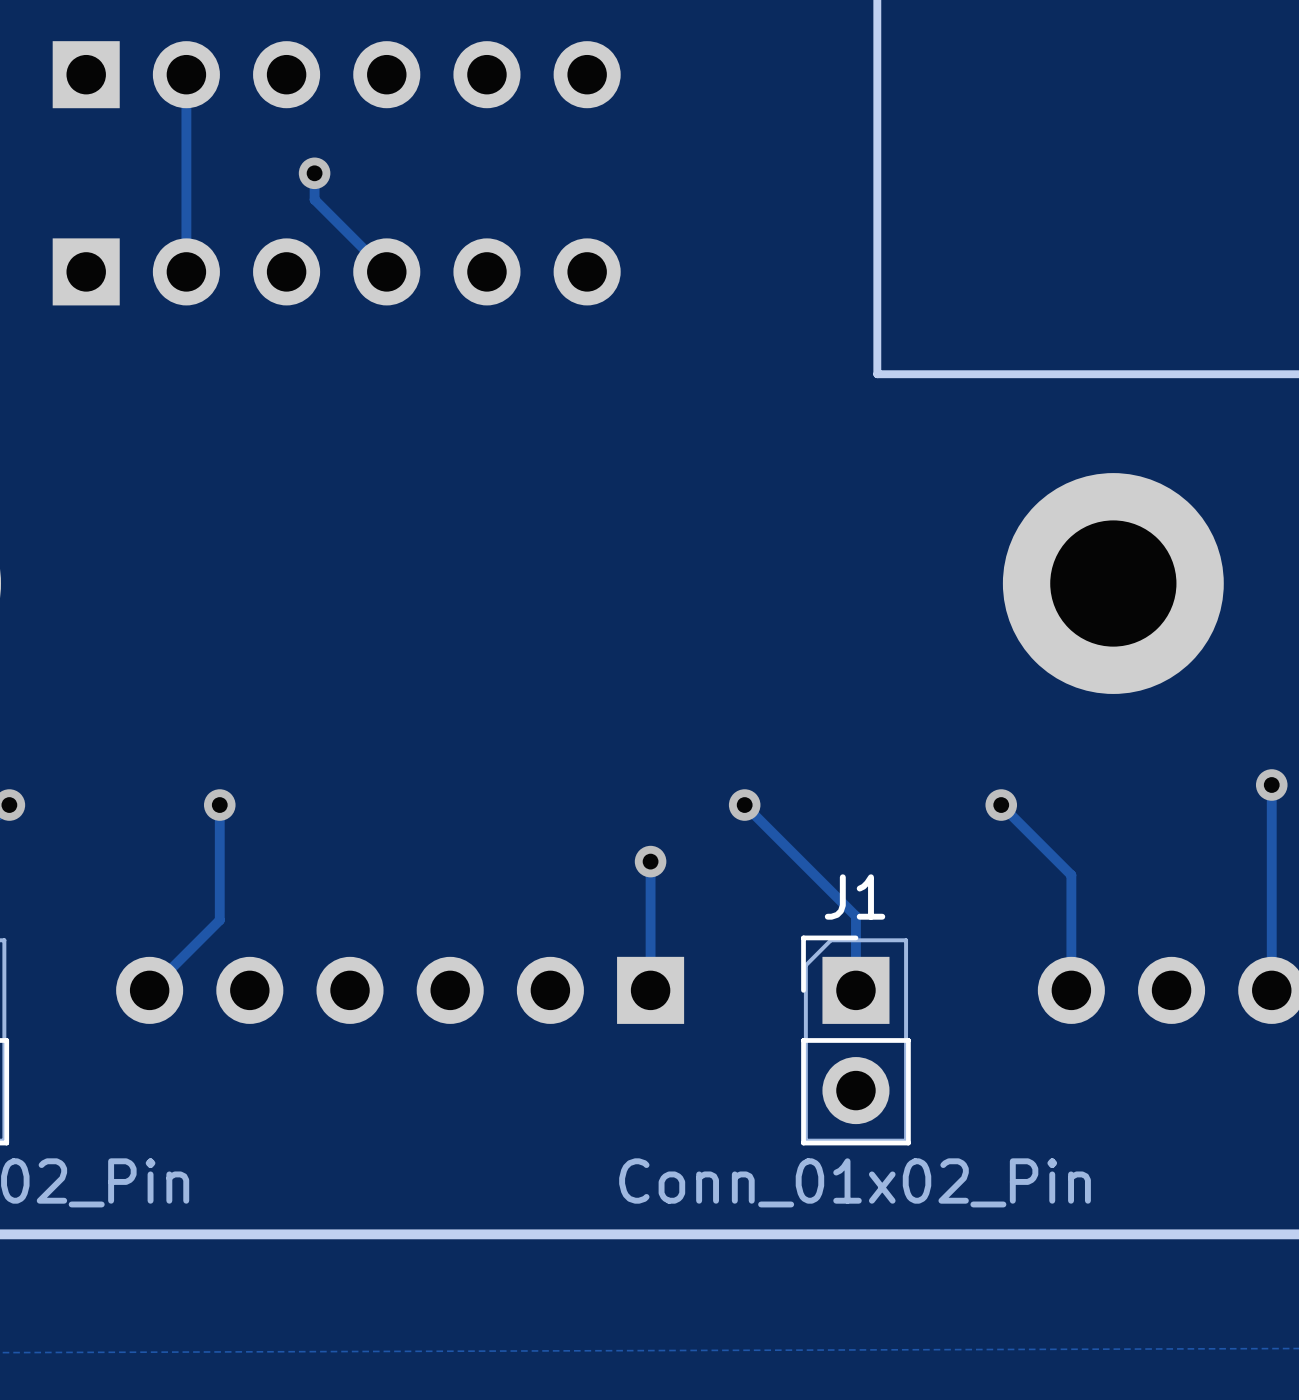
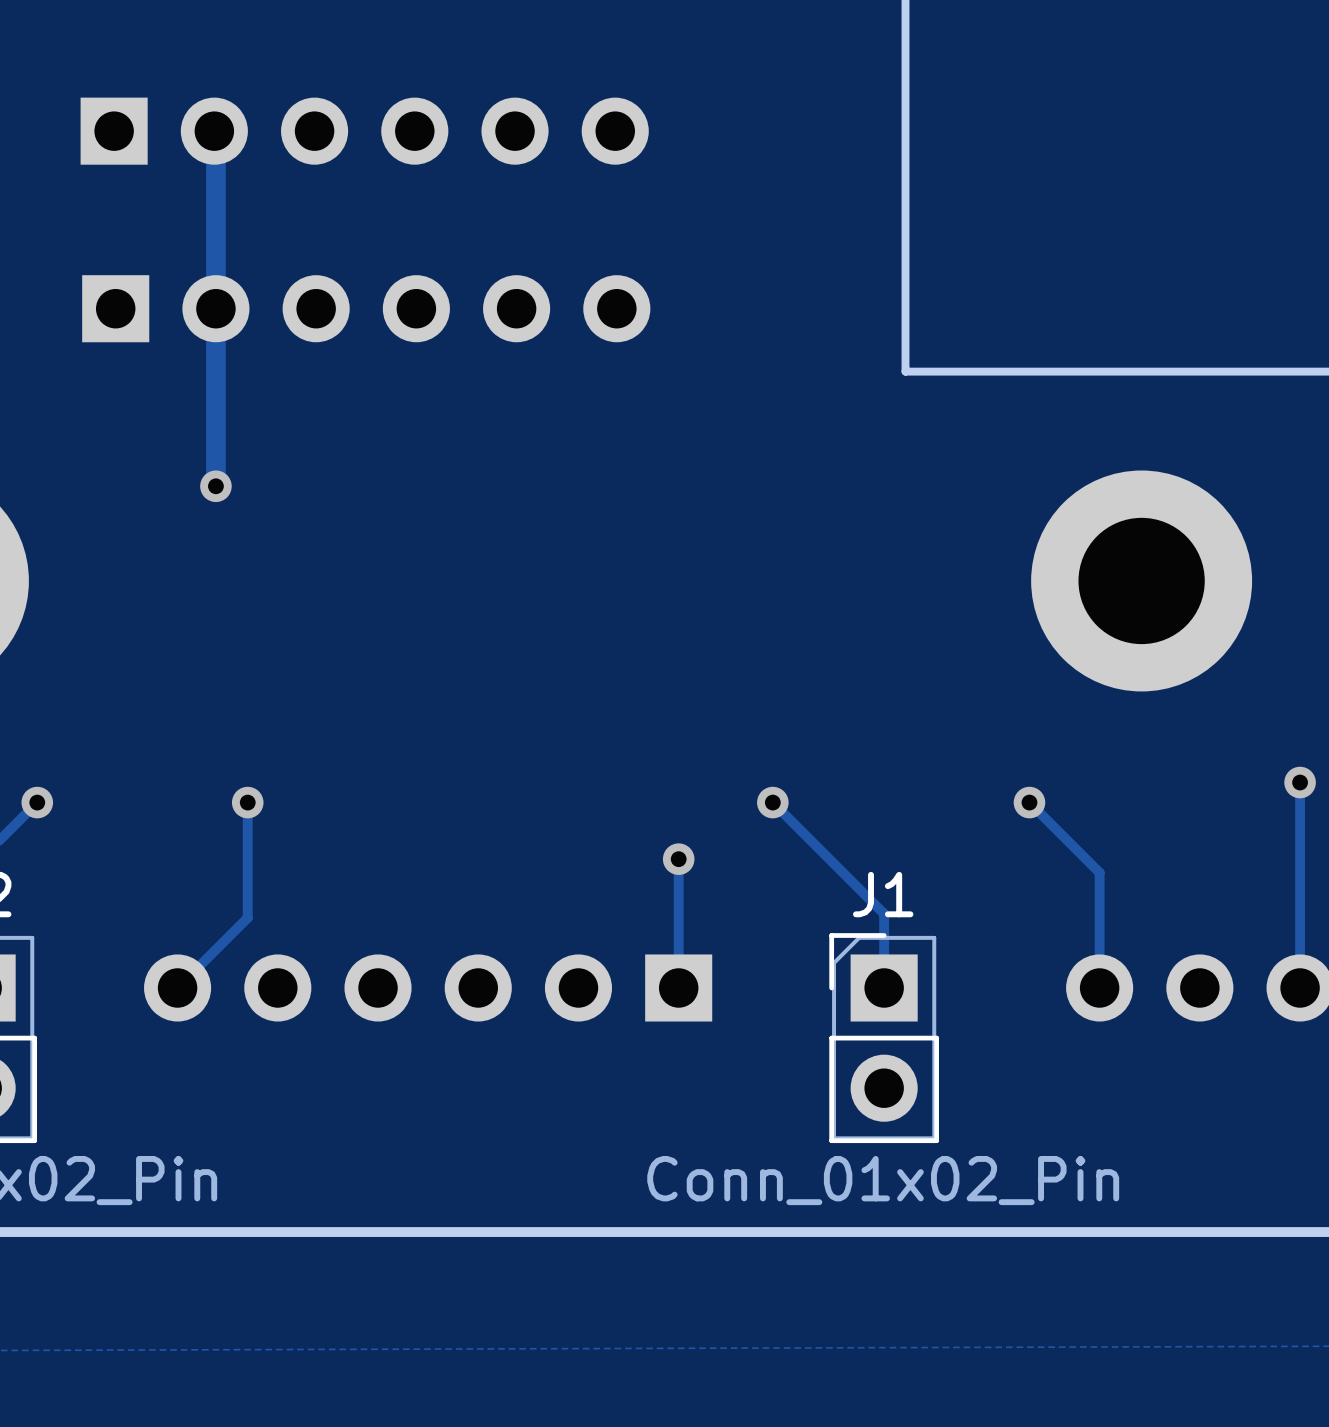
track: (186, 74) (186, 271) -> none
part position: (336, 74) -> (364, 131)
track: none -> (214, 131) (215, 132) (215, 486)
track: (314, 173) (314, 199) (386, 271) -> none
via: (314, 173) -> none
part position: (336, 271) -> (366, 308)
via: none -> (215, 486)

